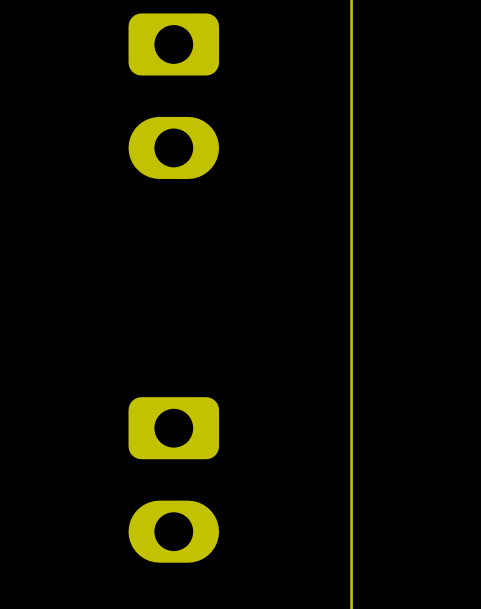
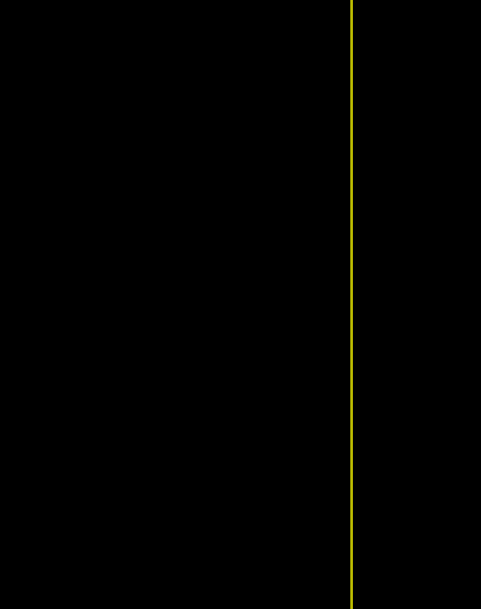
part: (173, 96) -> none
part: (173, 479) -> none

